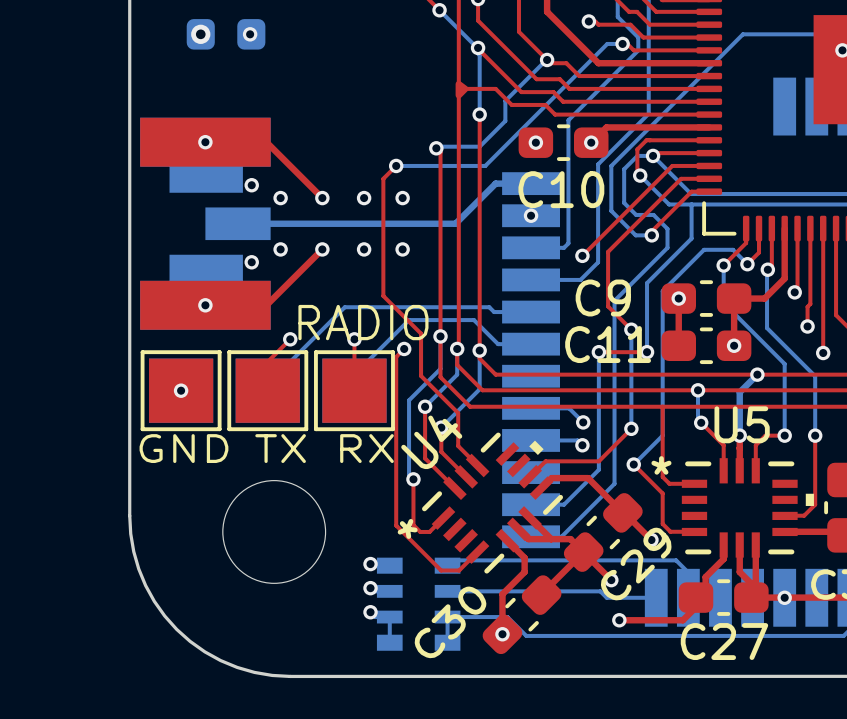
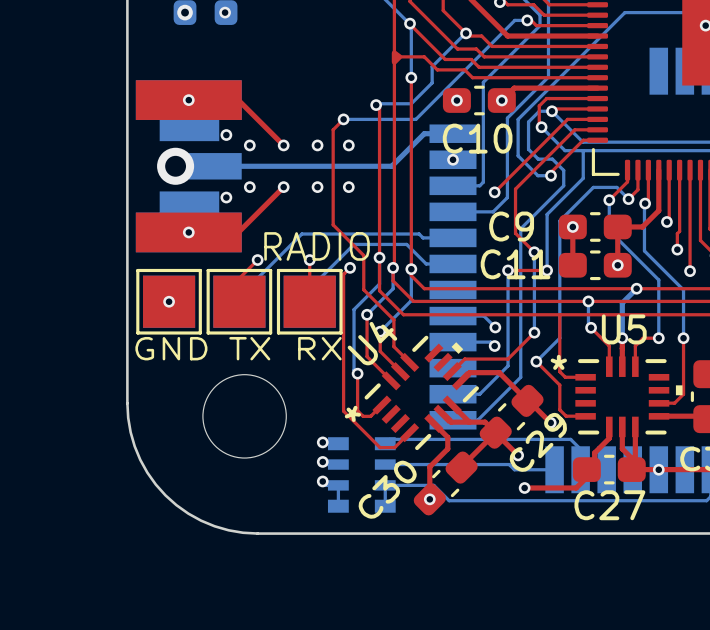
via: none -> (175, 166)

